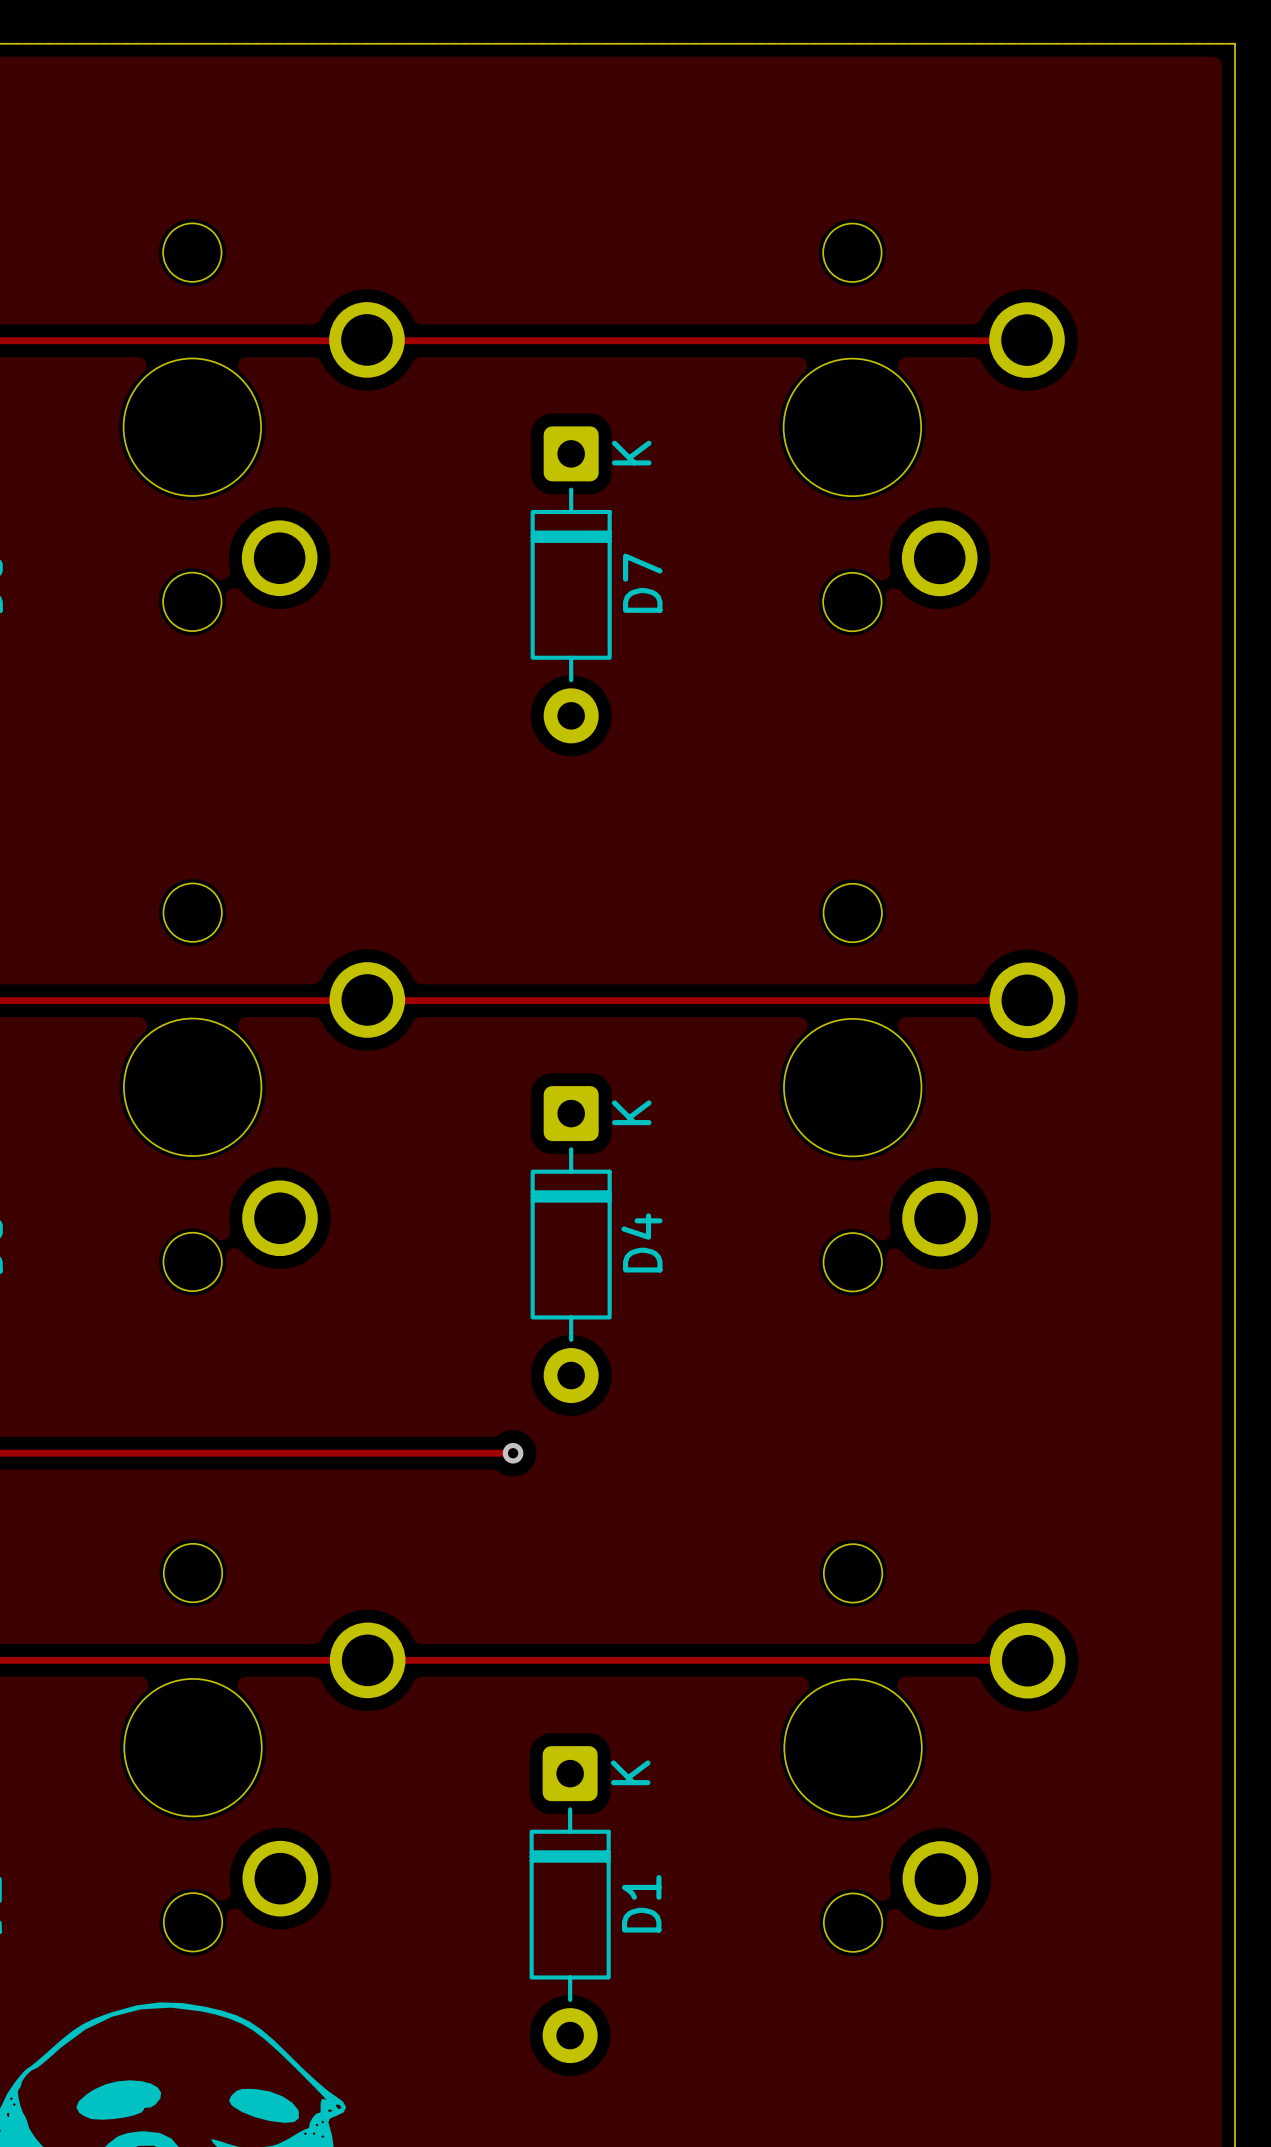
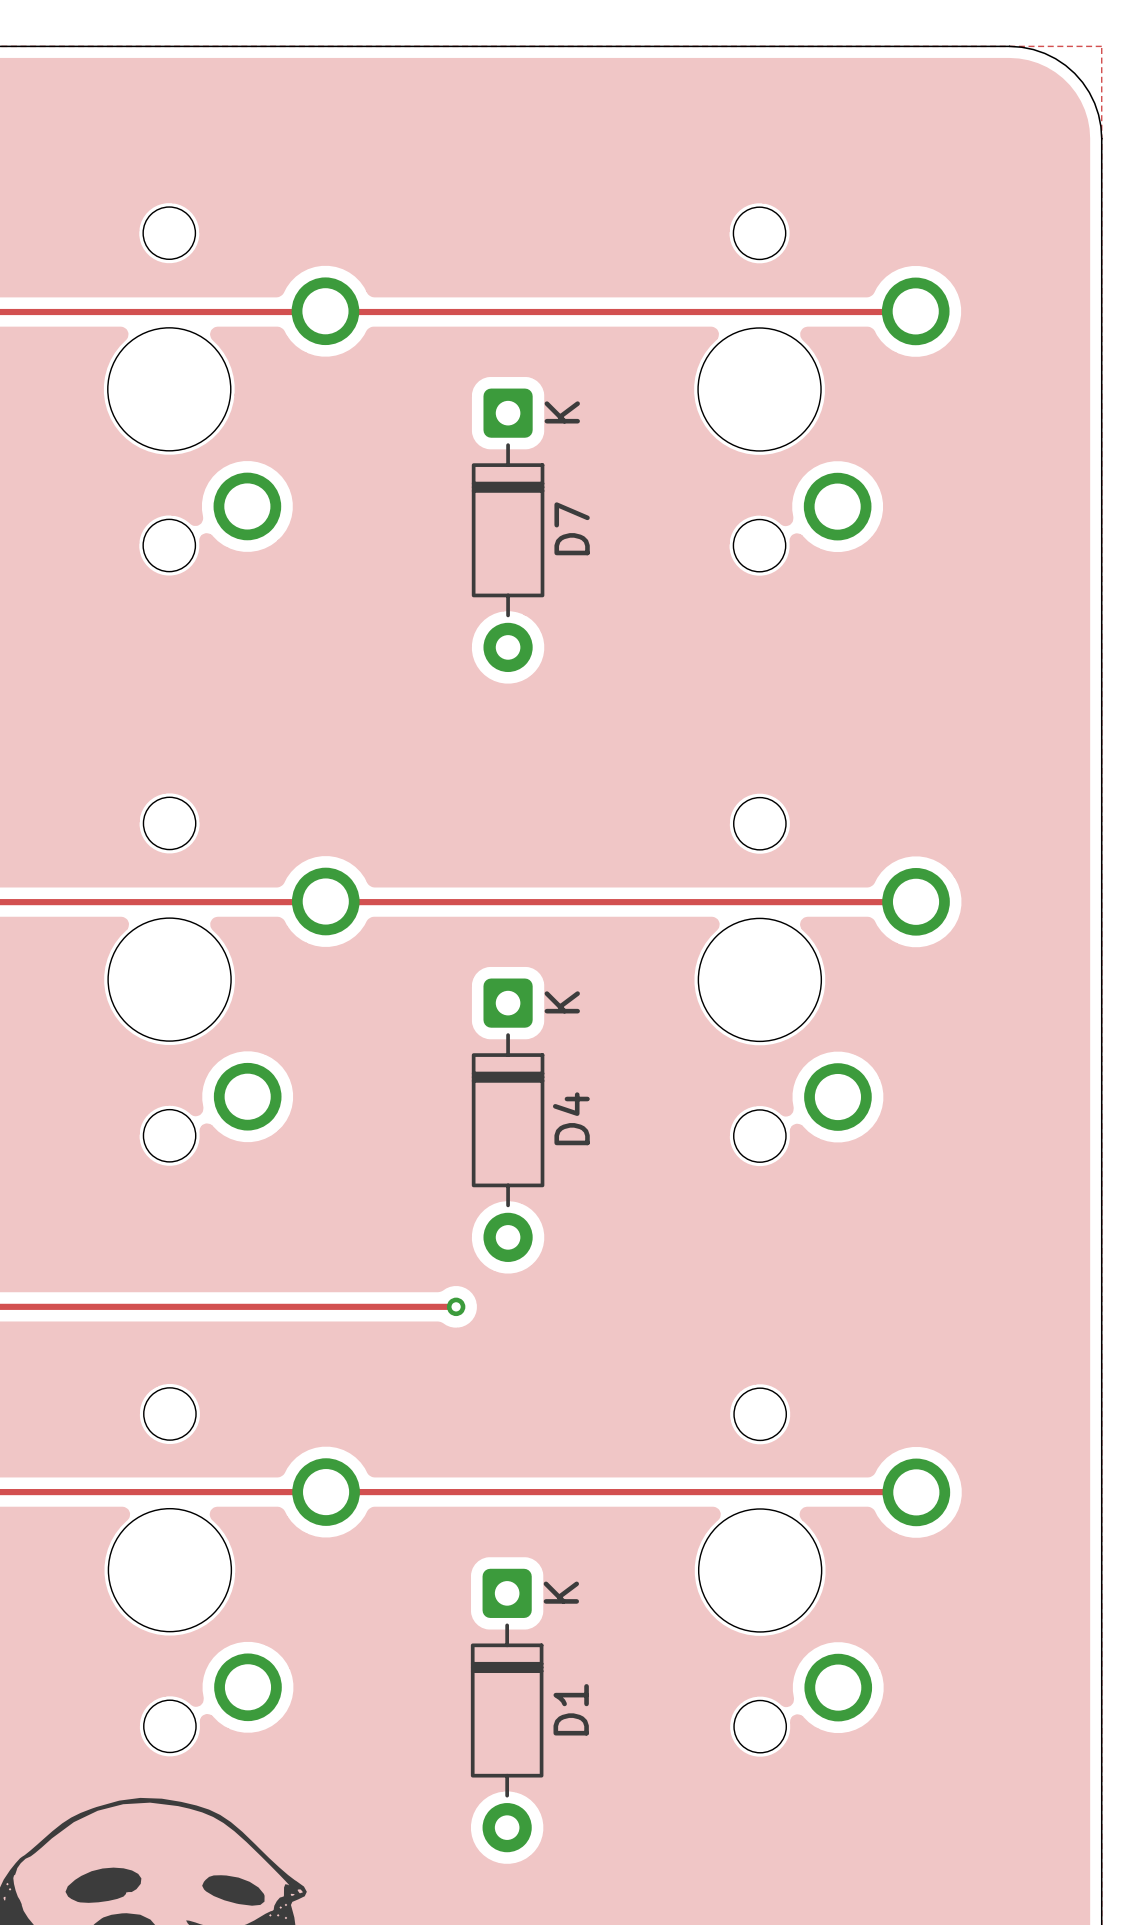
board edge: (1131, 43) (1235, 43) (1235, 146) -> (1009, 46) (1021, 47) (1044, 53) (1065, 65) (1074, 73) (1082, 82) (1094, 103) (1098, 114) (1101, 138)

